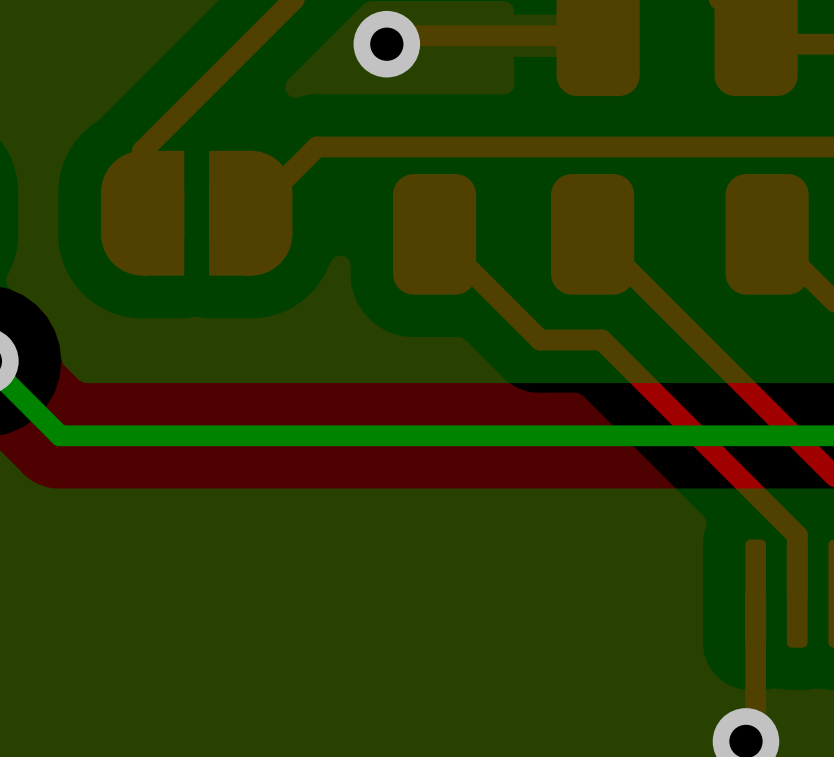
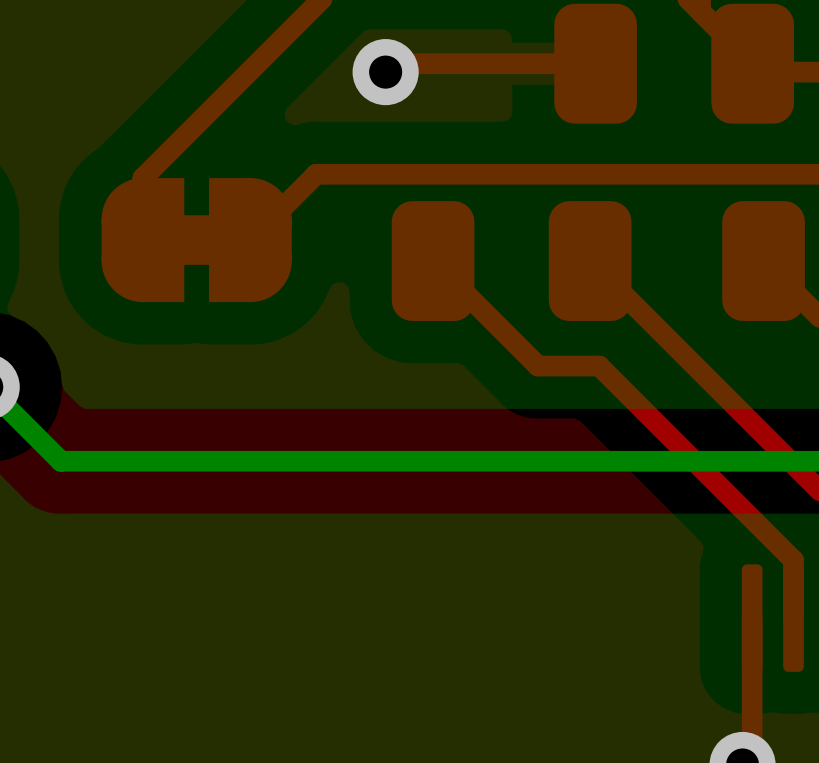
part footprint: [101, 150, 293, 276] -> [101, 178, 292, 303]

